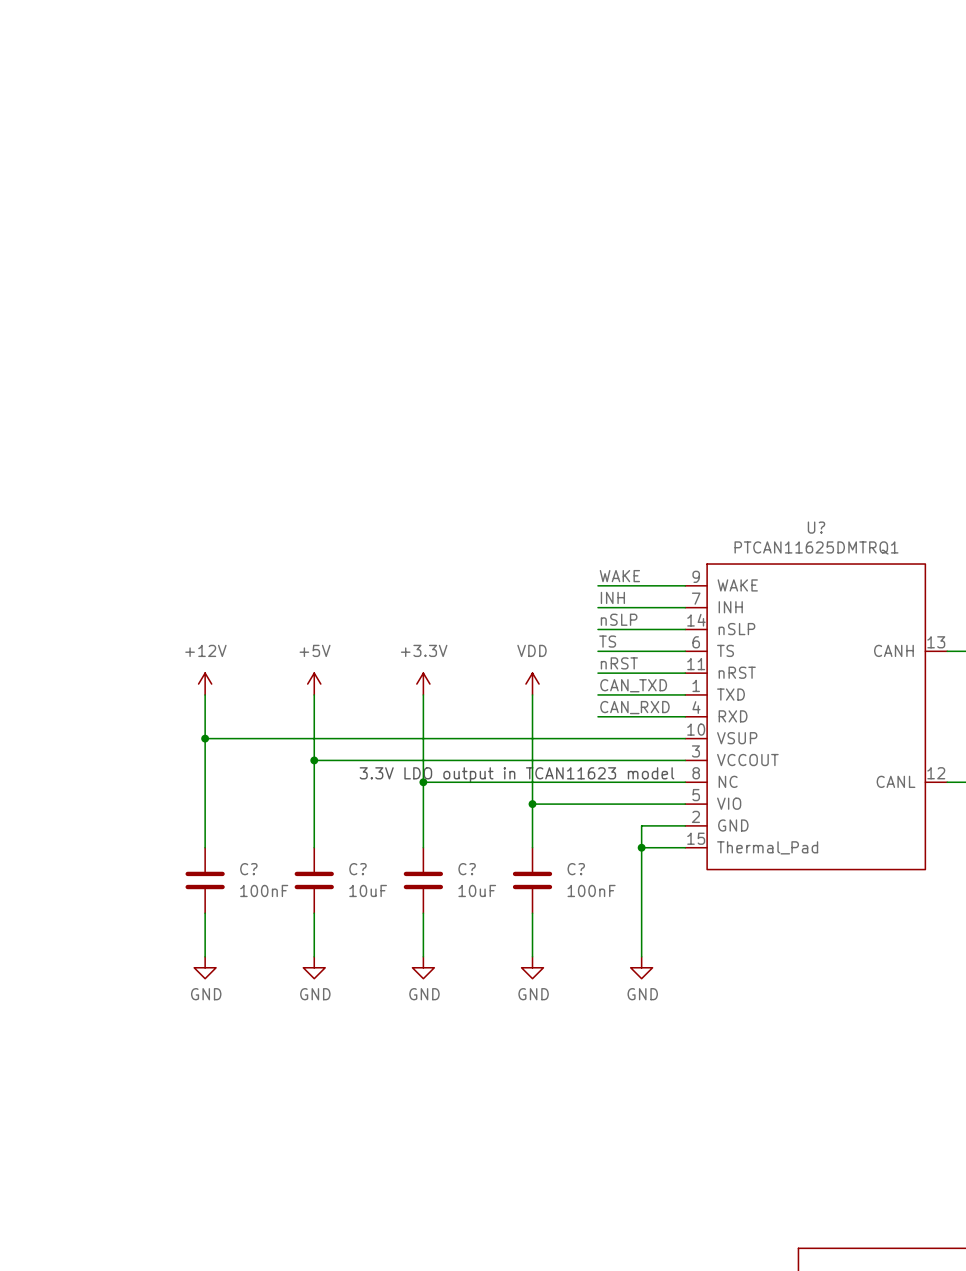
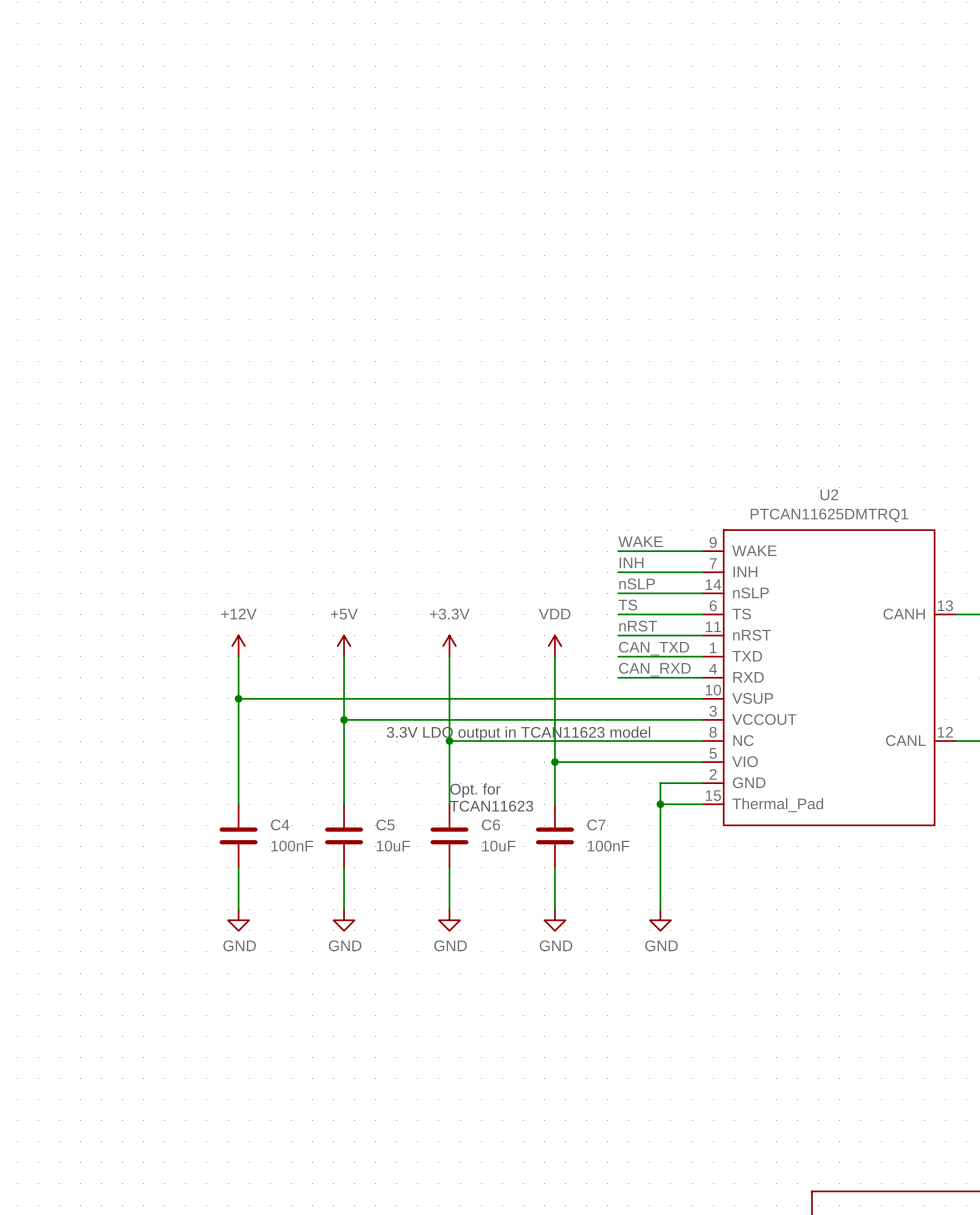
U? name: U? (816, 527) -> U2 (829, 494)
text: none -> Opt. for (475, 790)
text: none -> TCAN11623 (491, 806)
C? name: C? (248, 869) -> C4 (280, 824)
C? name: C? (357, 869) -> C5 (385, 824)
C? name: C? (467, 869) -> C6 (490, 824)
C? name: C? (576, 869) -> C7 (596, 824)

